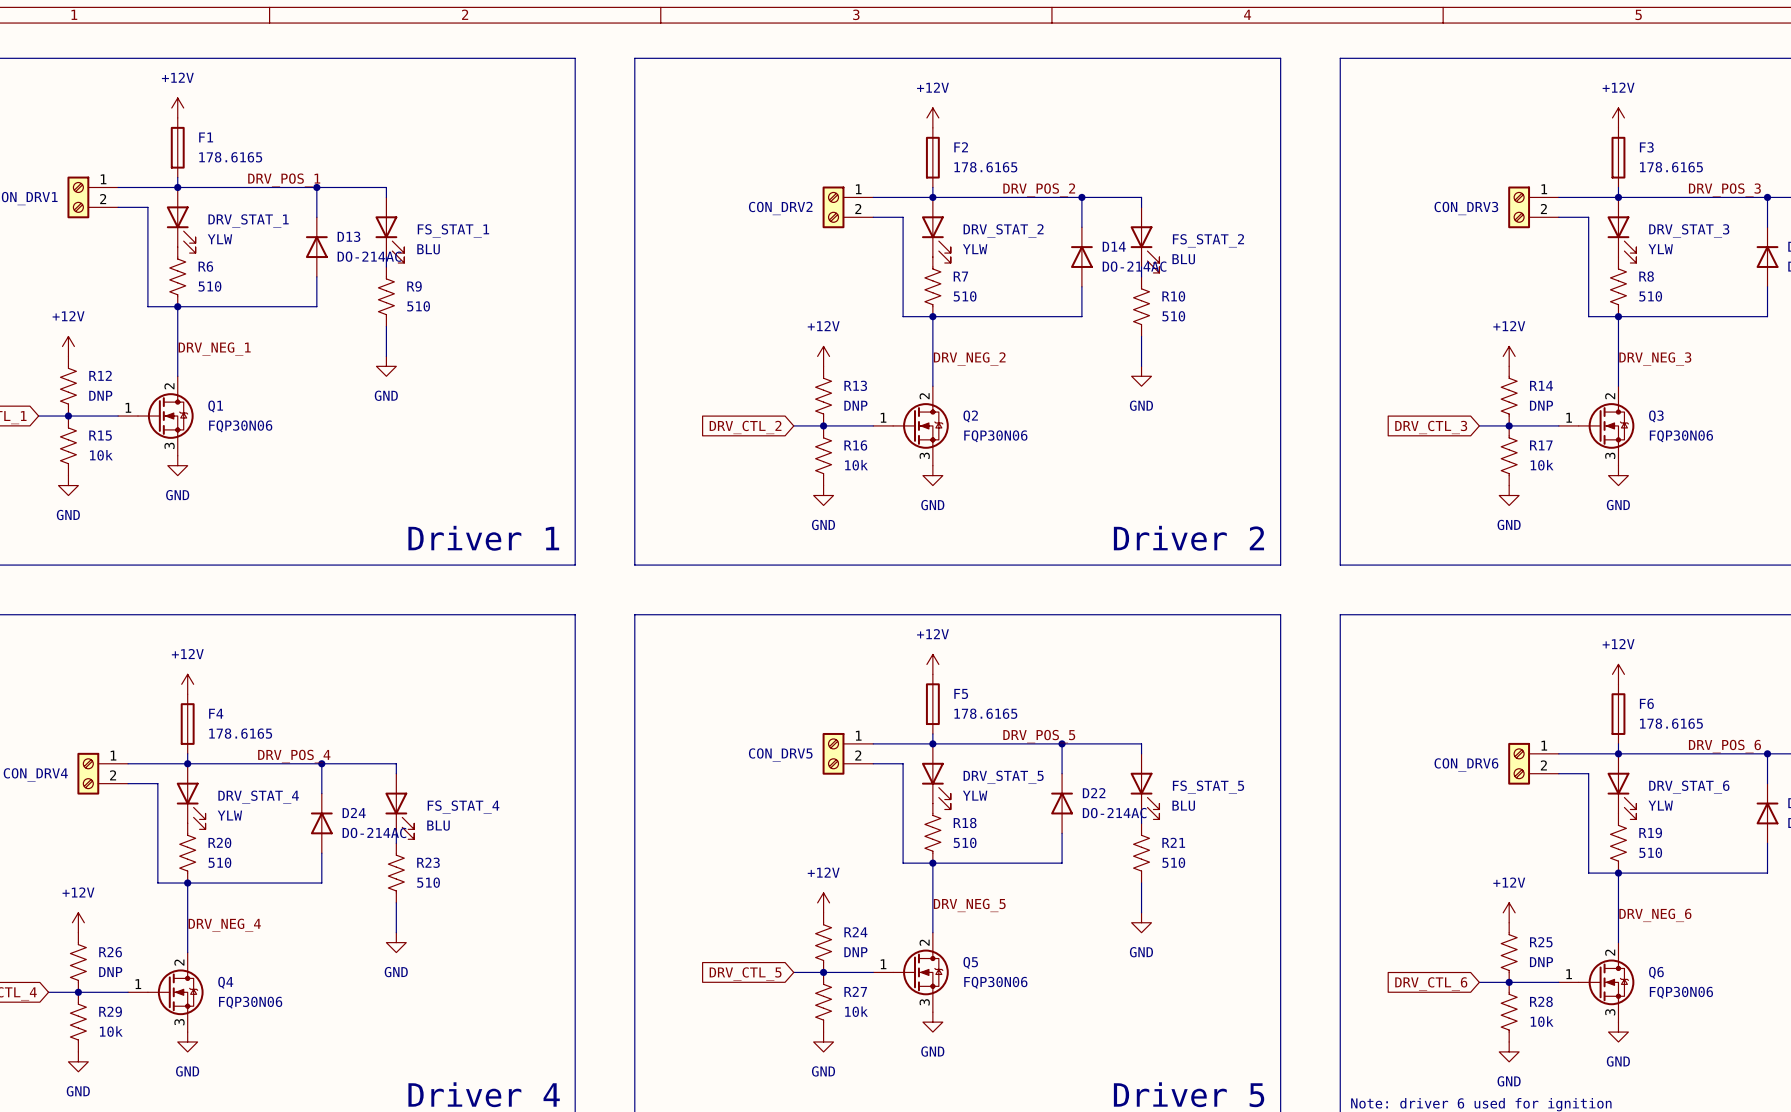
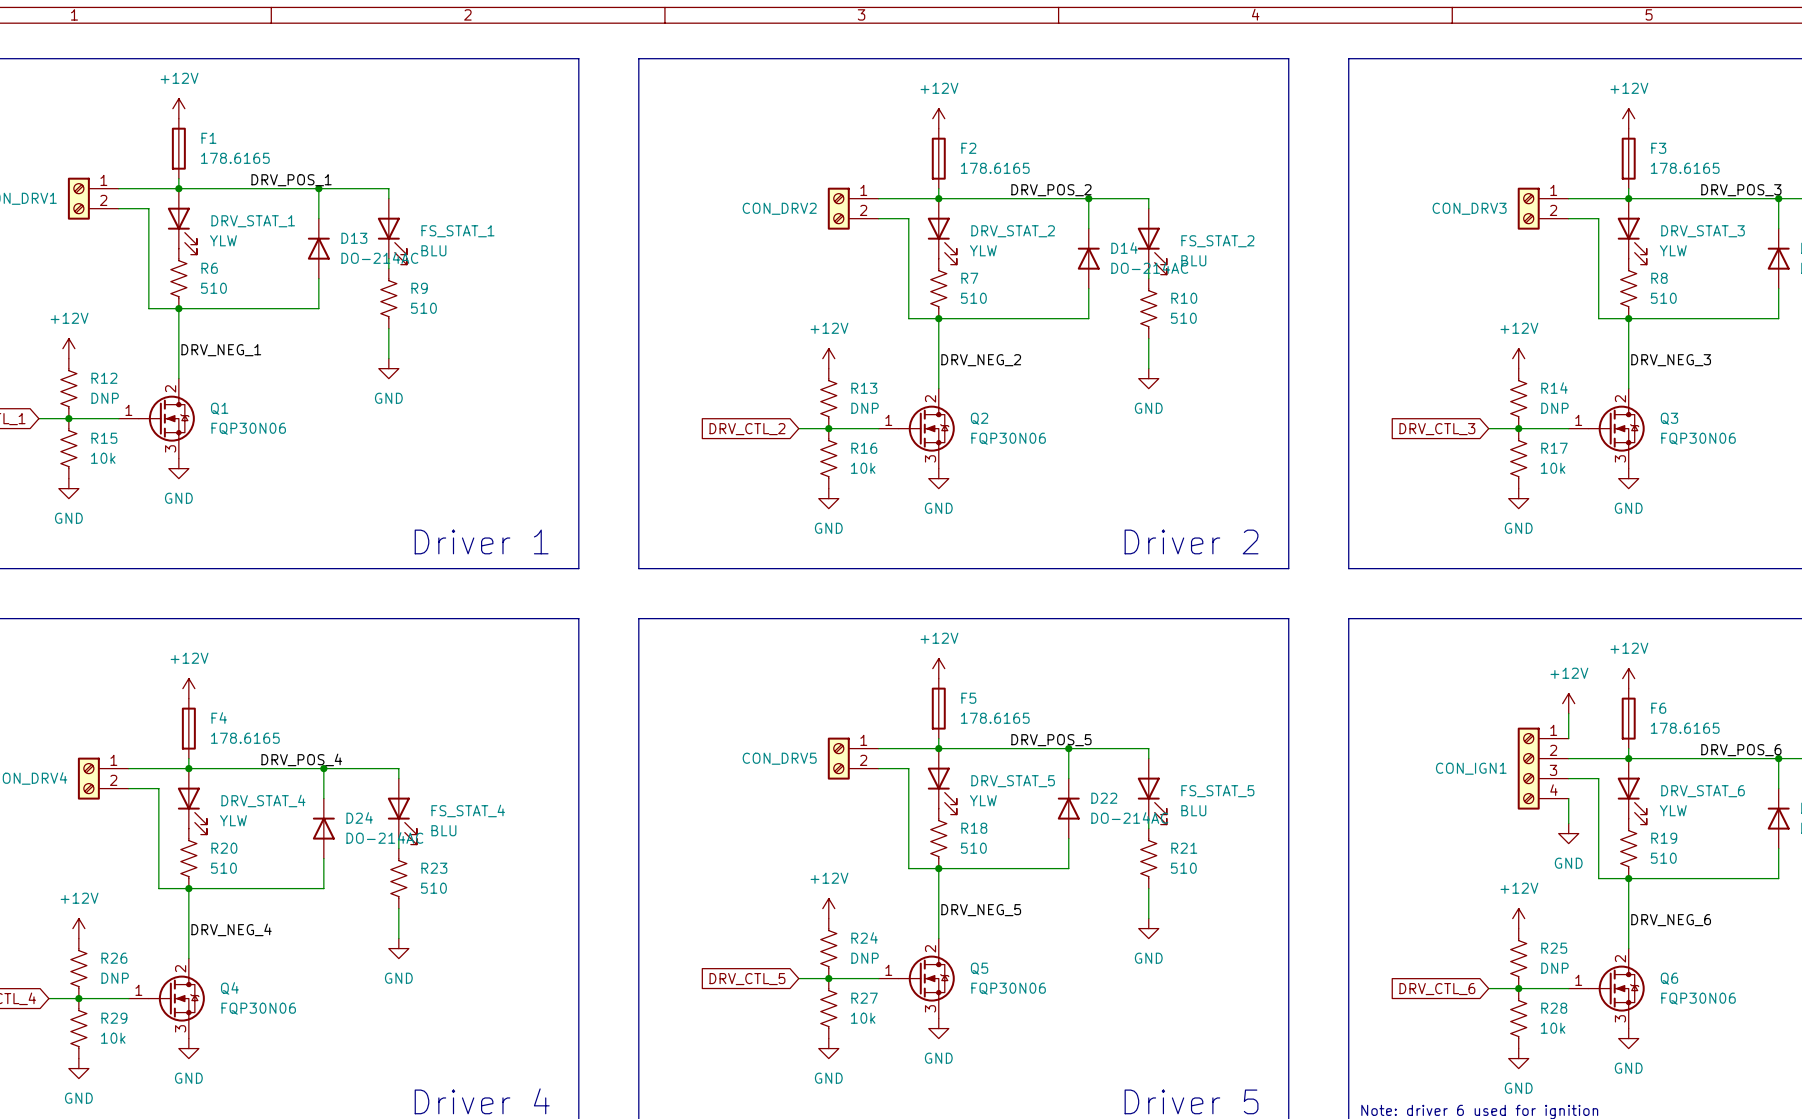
power symbol: none -> +12V (1568, 703)
wire: none -> (1568, 713) (1568, 738)
CON_DRV6: (1533, 763) -> none
CON_IGN1: none -> (1543, 768)
wire: none -> (1568, 798) (1568, 823)
power symbol: none -> GND (1568, 833)

